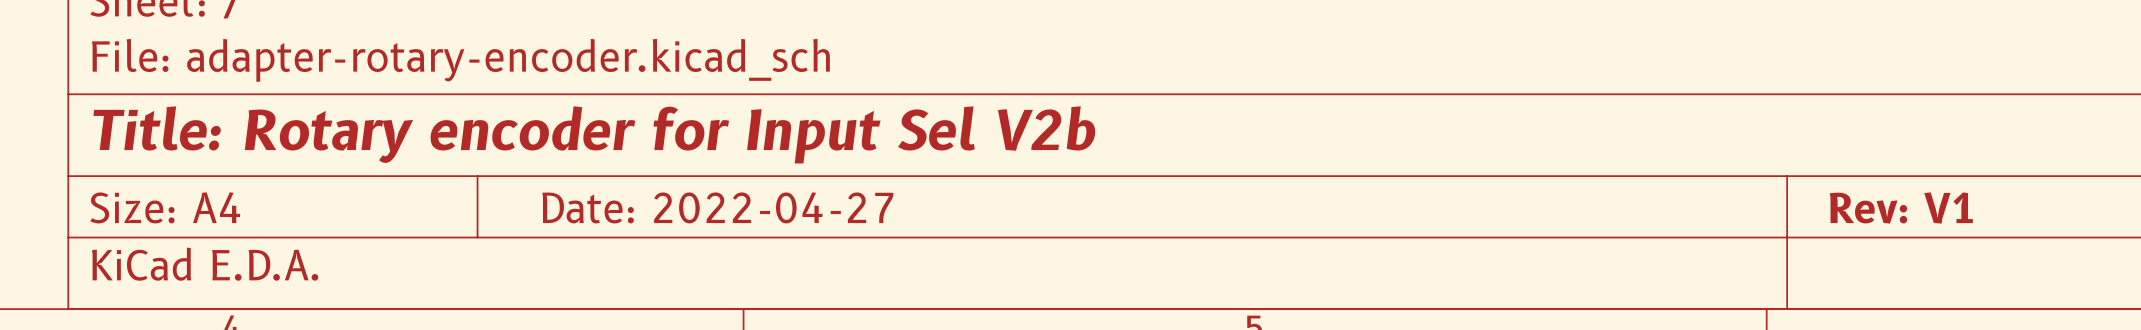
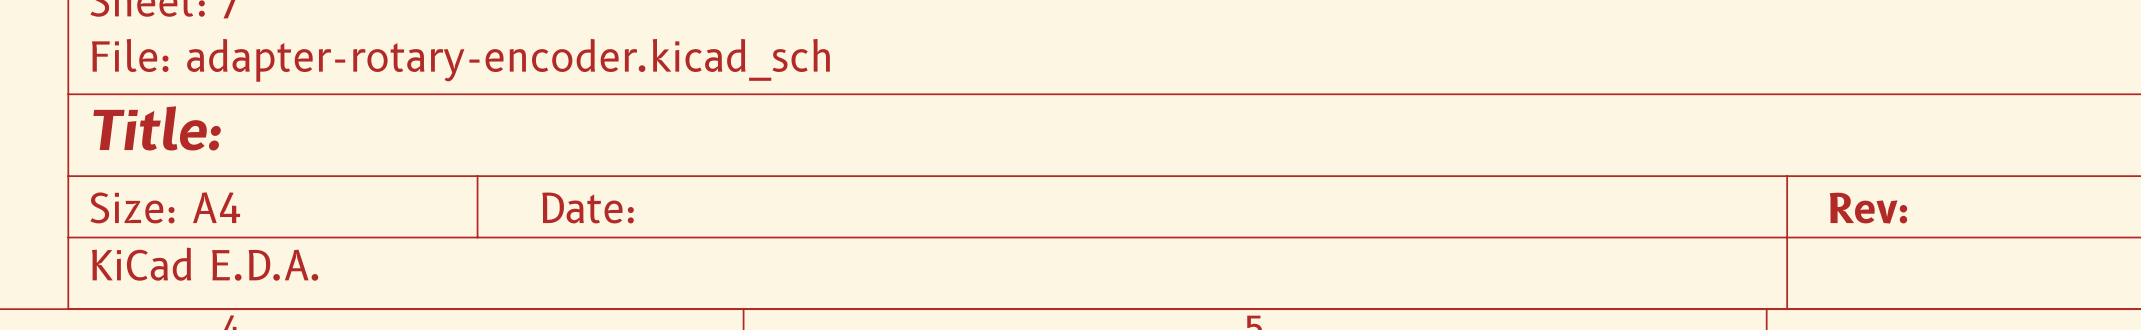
title block: Title: Rotary encoder for Input Sel V2b (594, 134) -> Title: (157, 128)
title block: Date: 2022-04-27 (717, 207) -> Date: (588, 207)
title block: Rev: V1 (1901, 207) -> Rev: (1868, 208)

